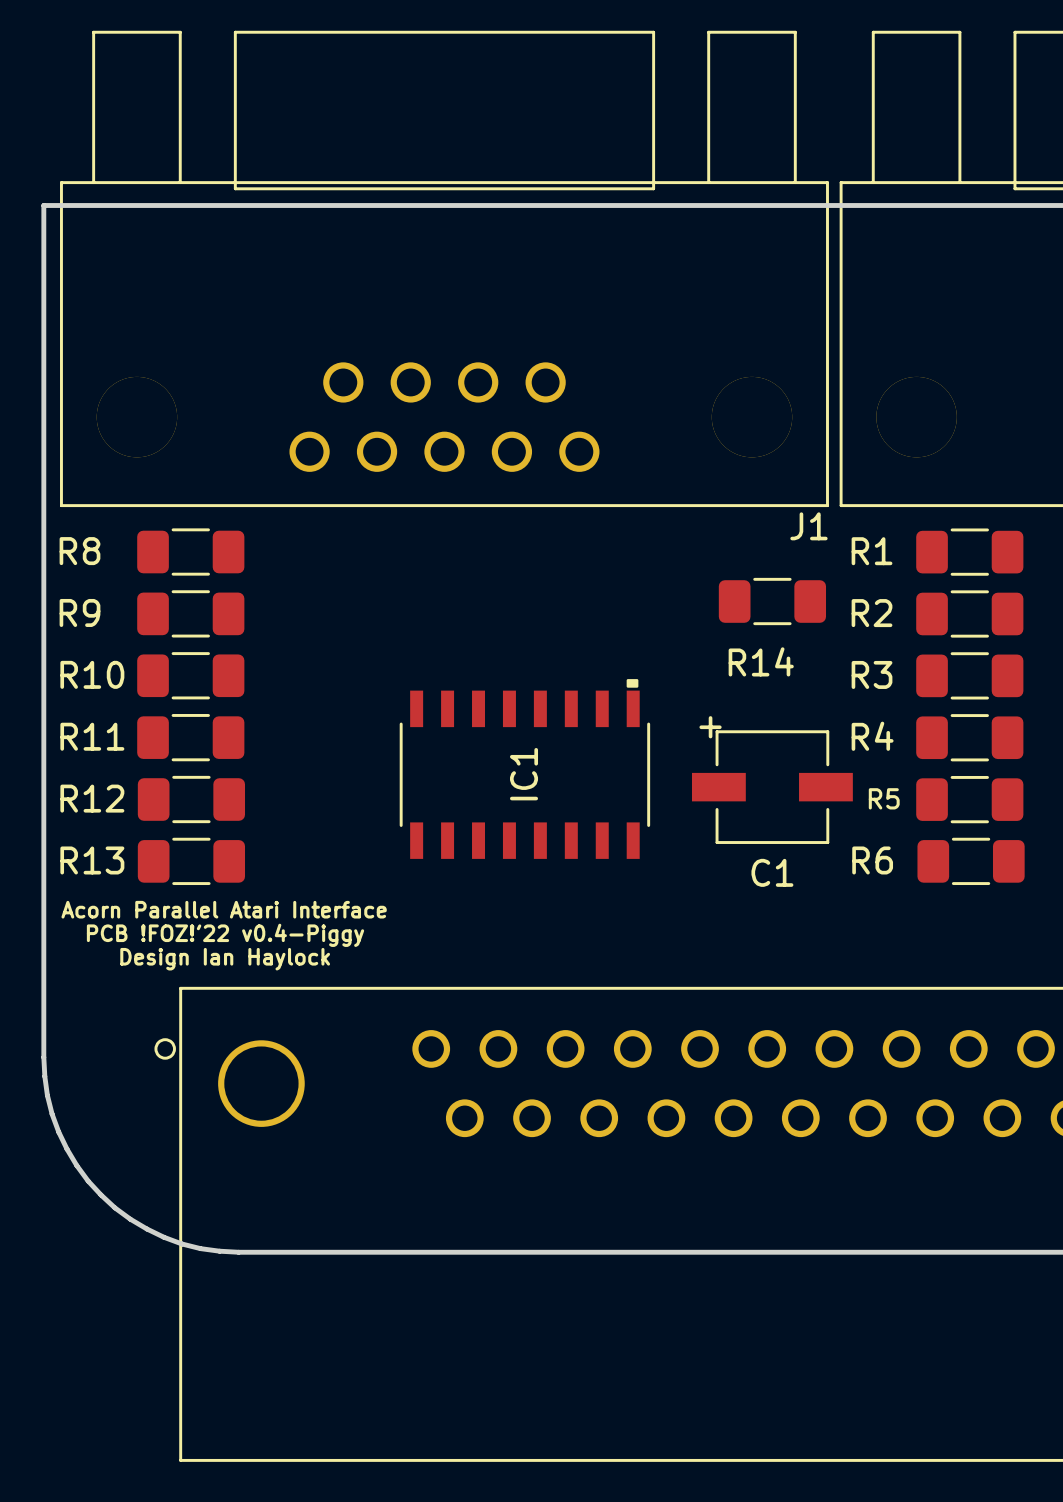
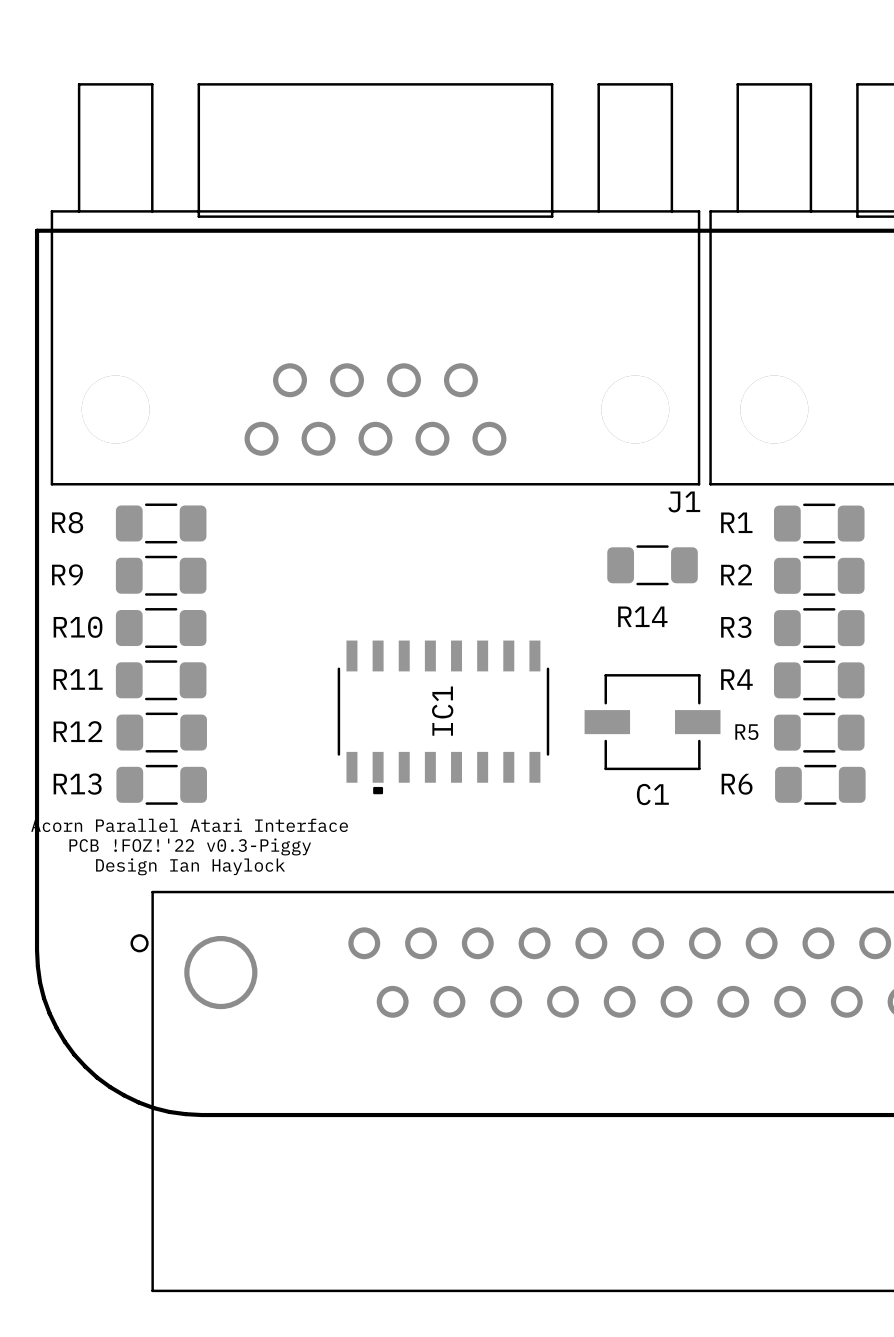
IC1 footprint: [399, 679, 651, 859] -> [337, 640, 550, 795]
C1 text: + (710, 727) -> none
text: PCB !FOZ!'22 v0.4-Piggy (225, 935) -> PCB !FOZ!'22 v0.3-Piggy (190, 846)

